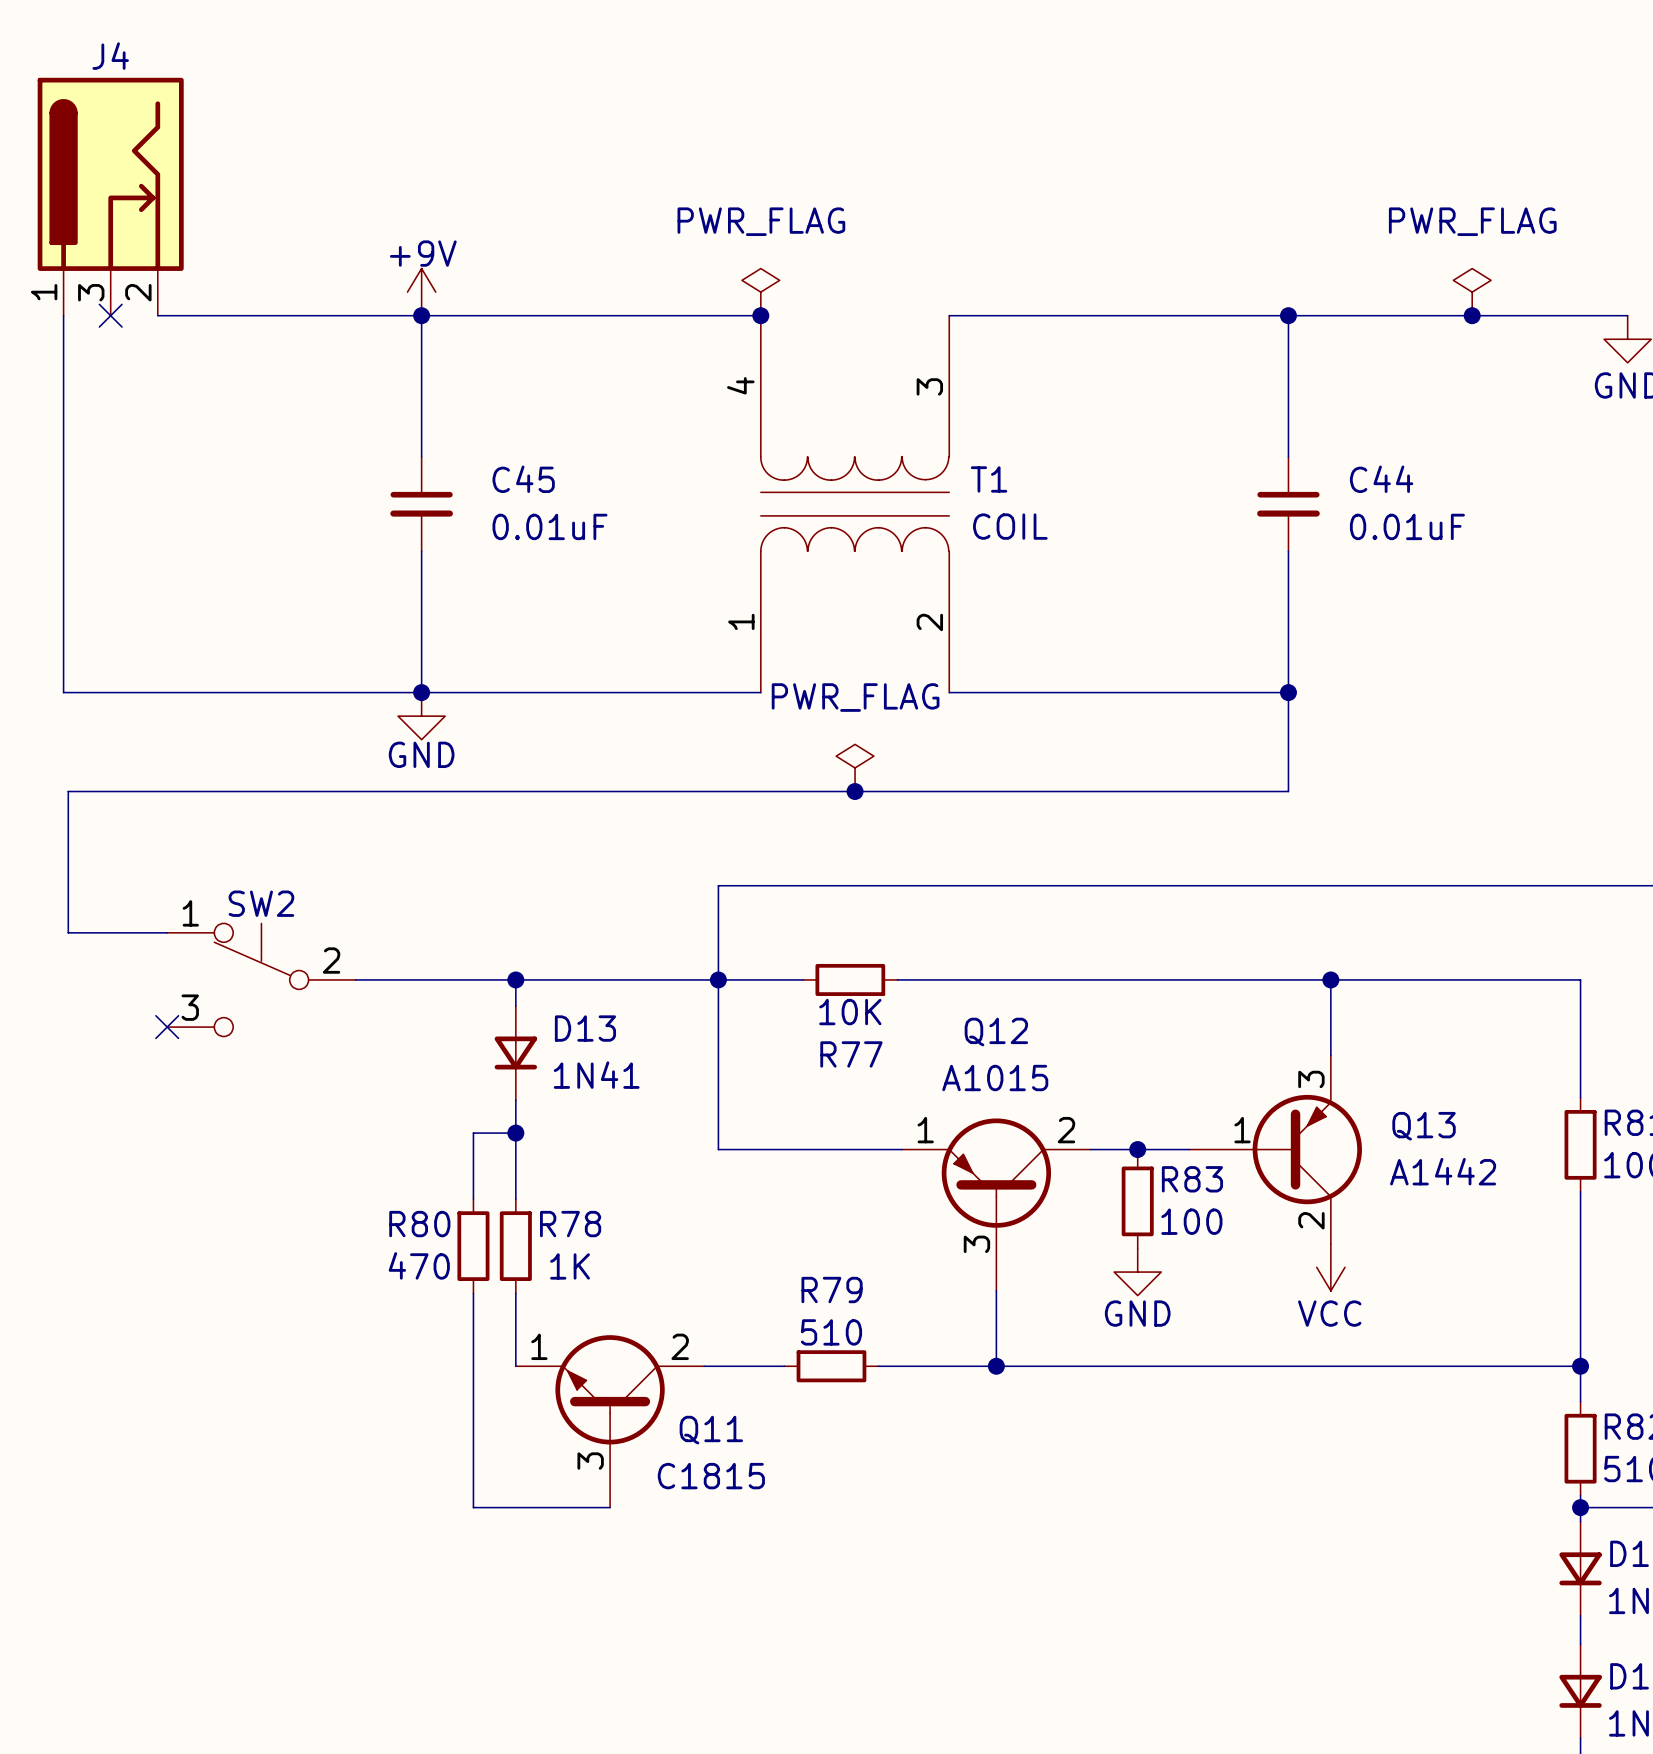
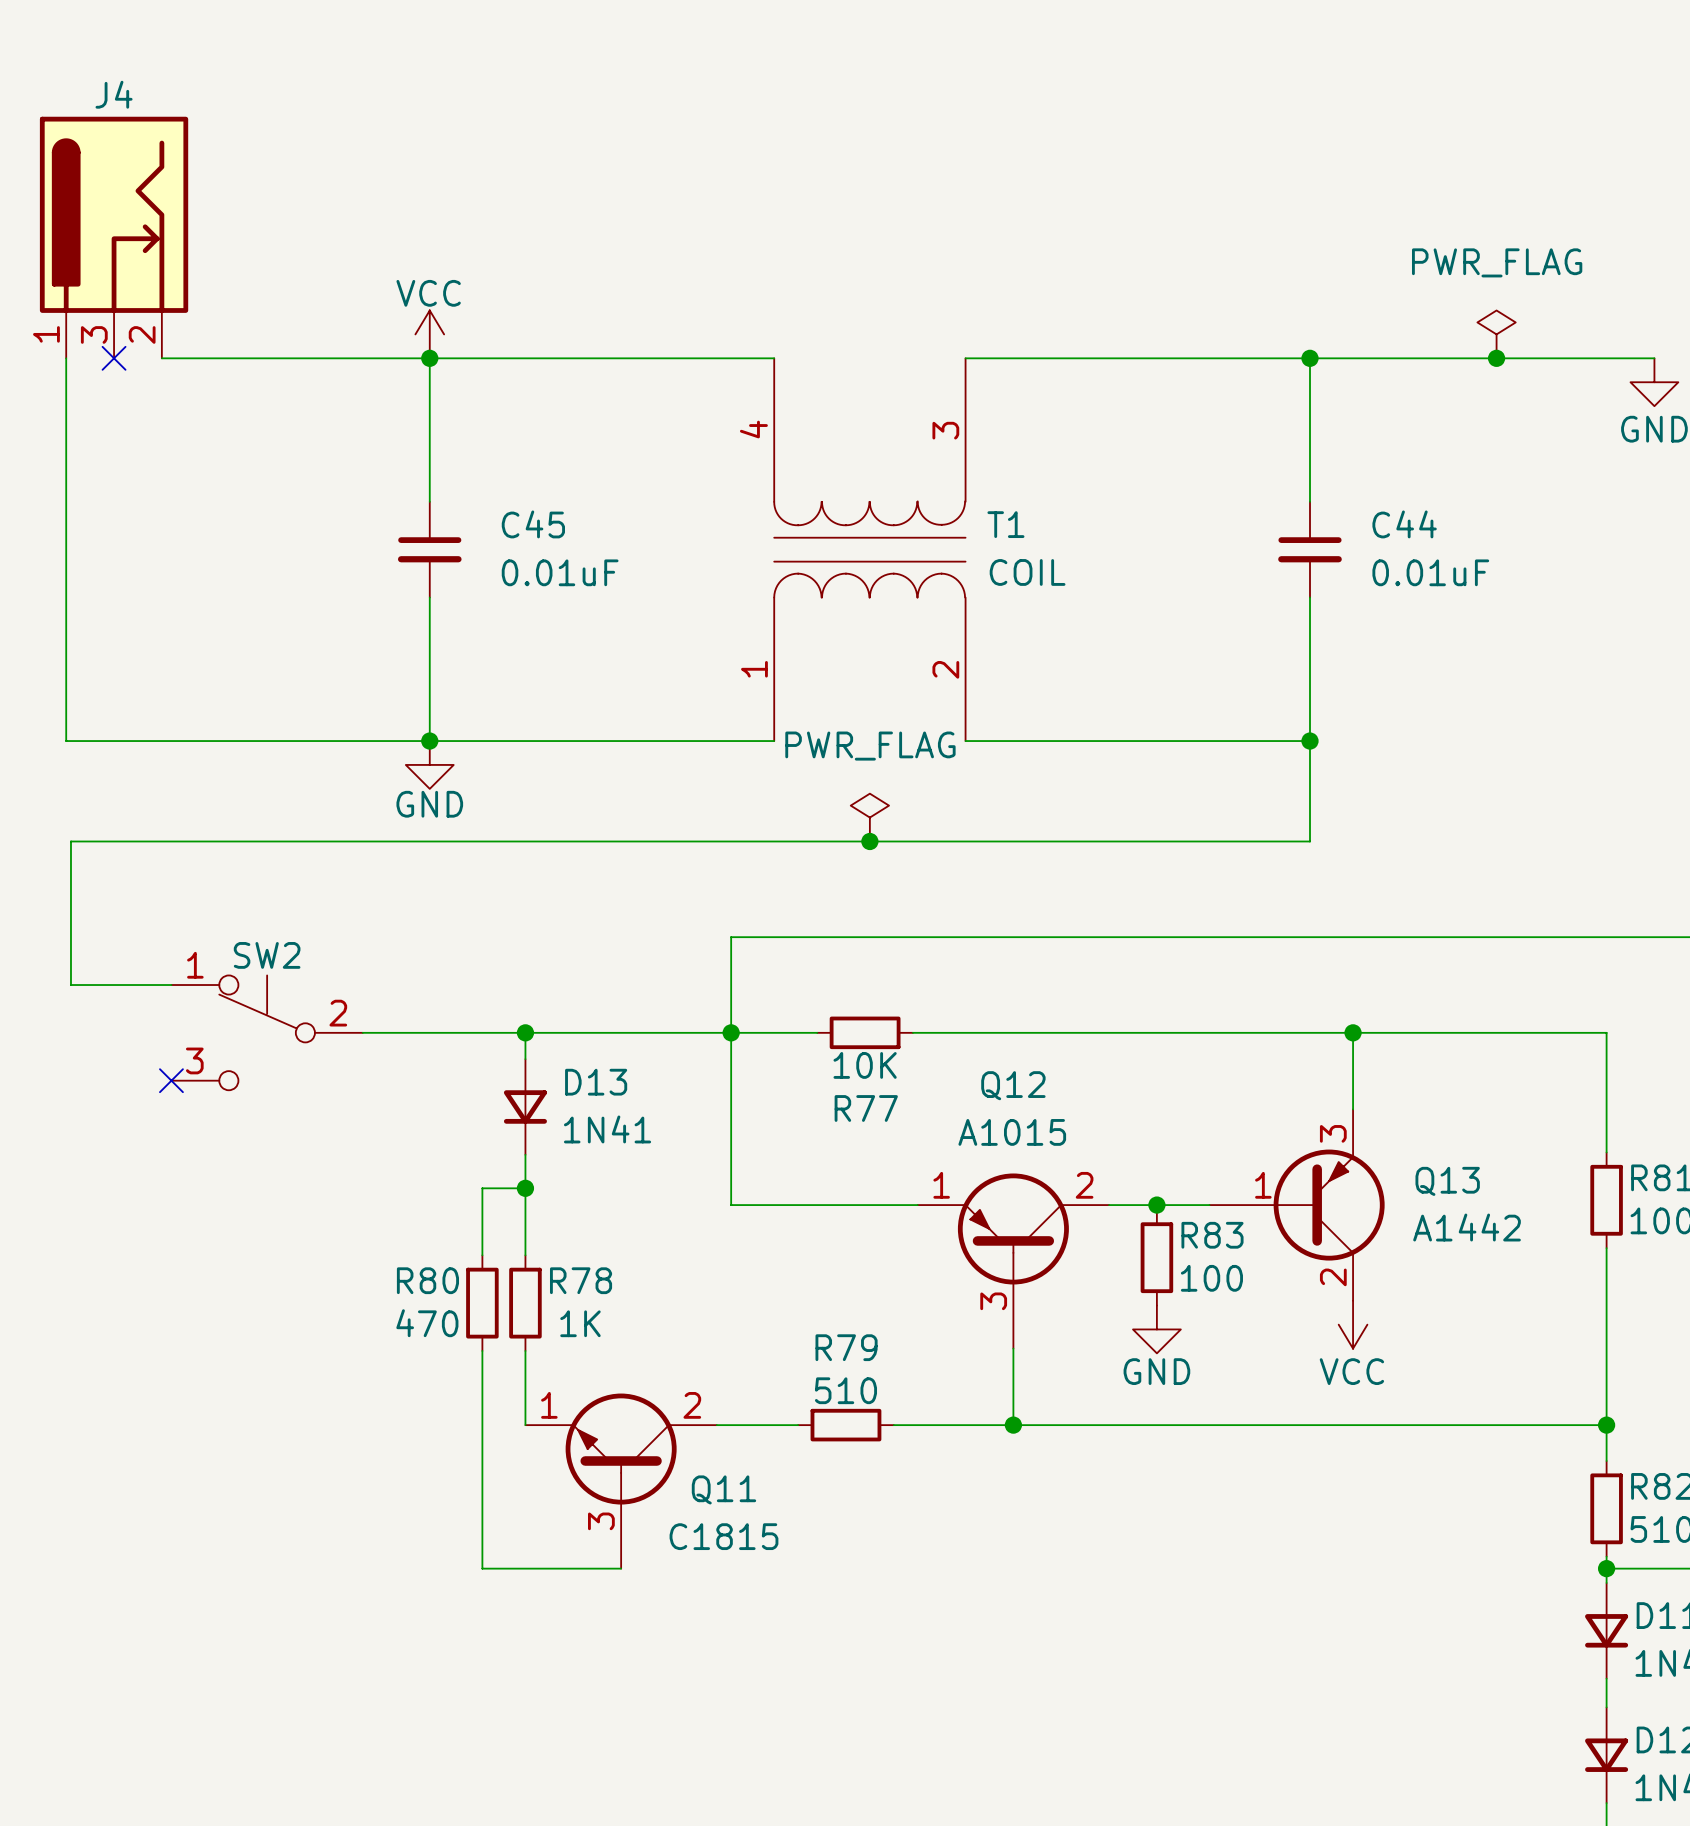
power symbol: +9V (421, 292) -> VCC (429, 334)
power symbol: PWR_FLAG (760, 292) -> none
junction: (760, 315) -> none

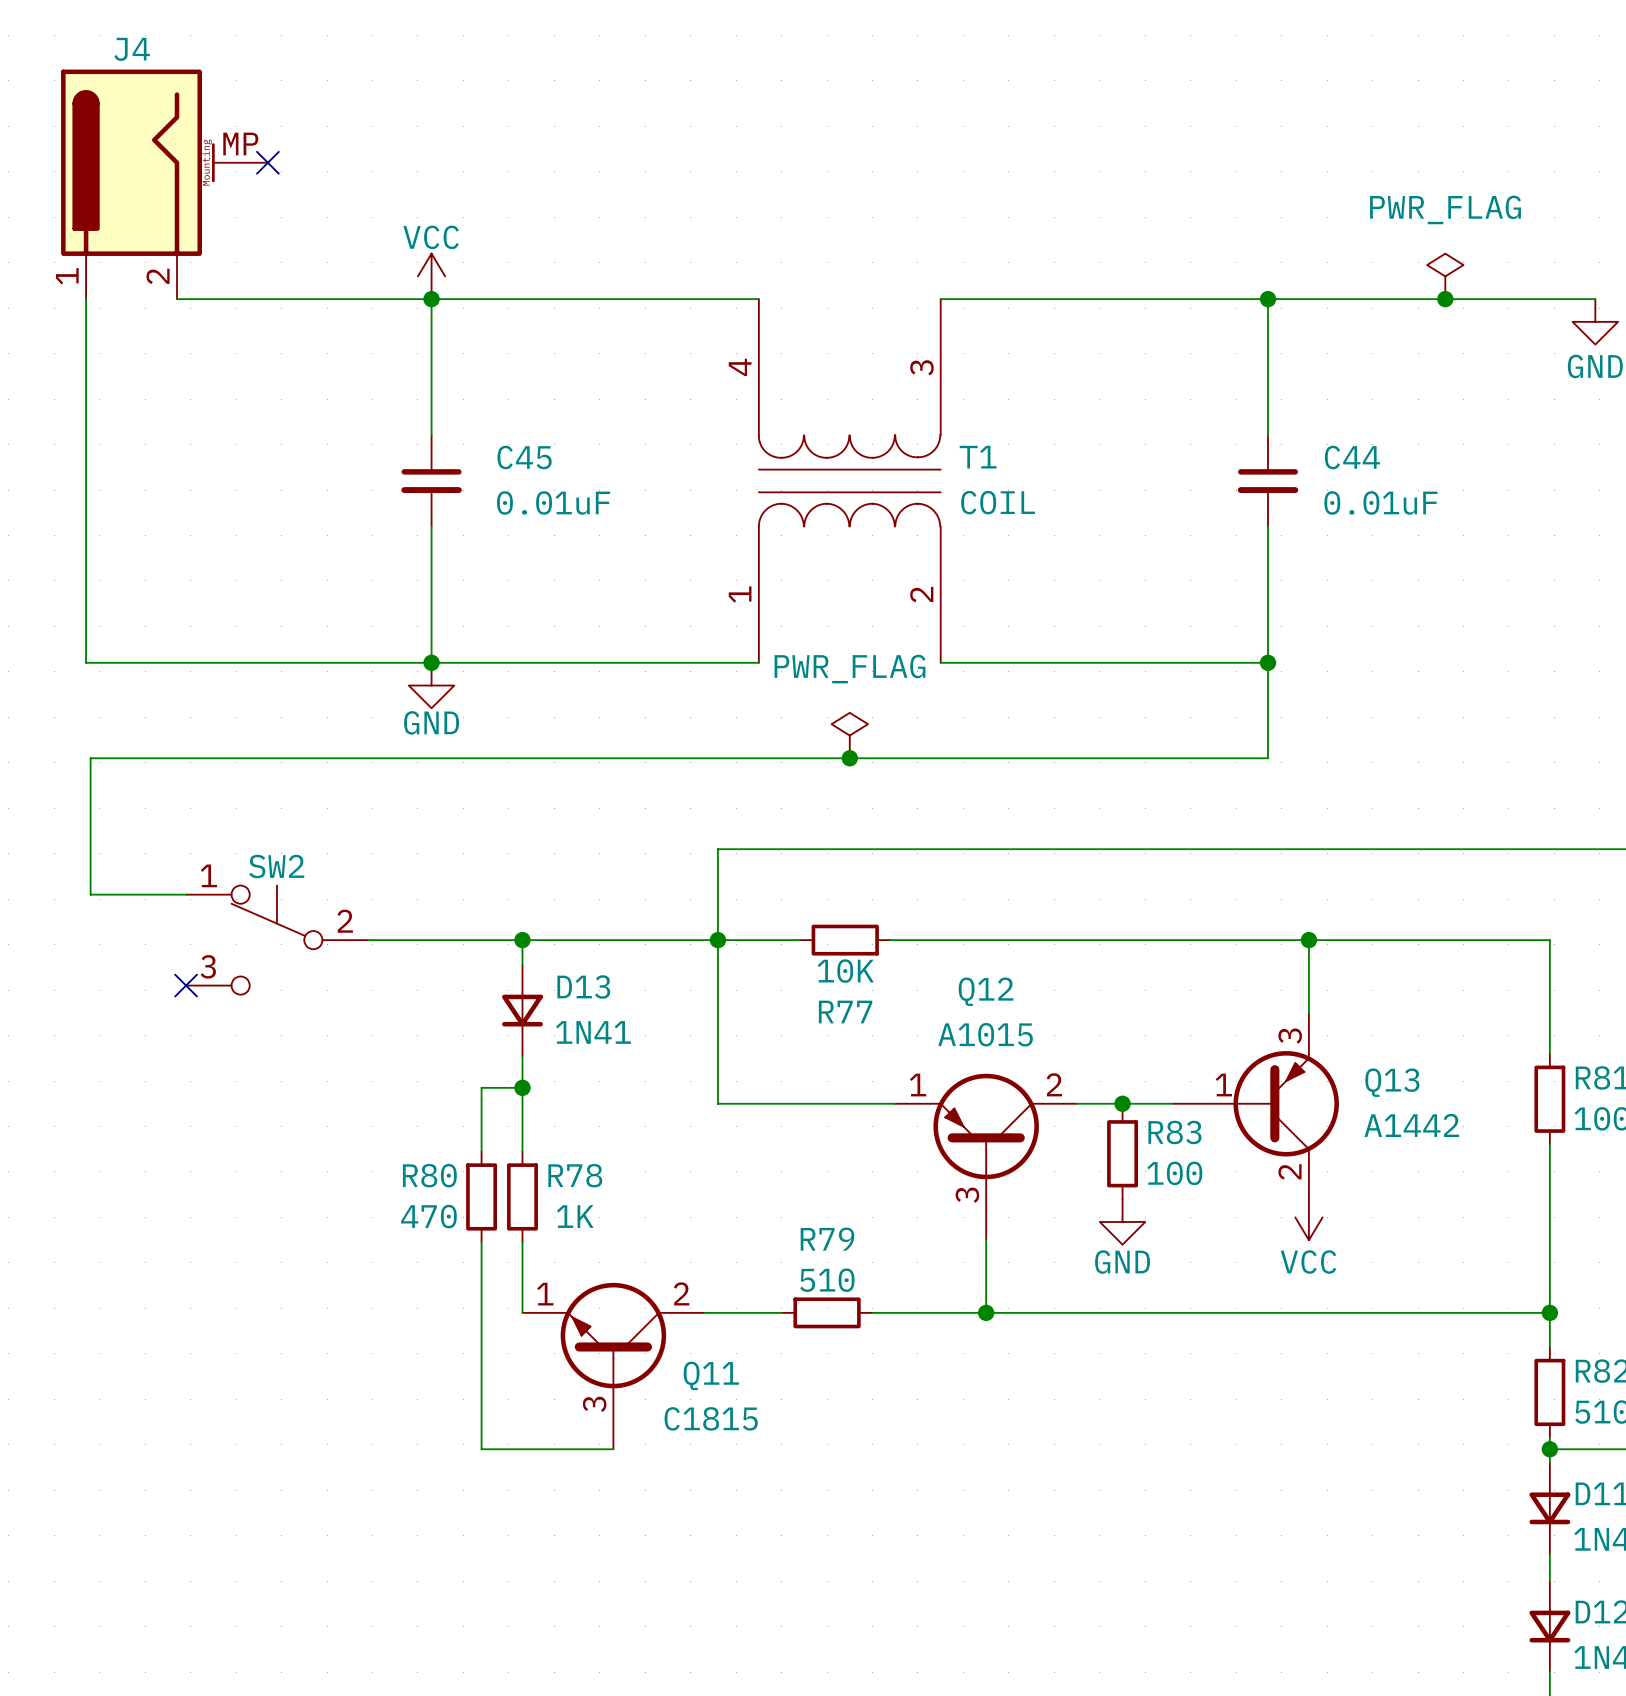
J4 symbol: [39, 116, 189, 359] -> [61, 69, 268, 300]
no-connect mark: none -> (267, 162)
no-connect mark: (114, 358) -> none

